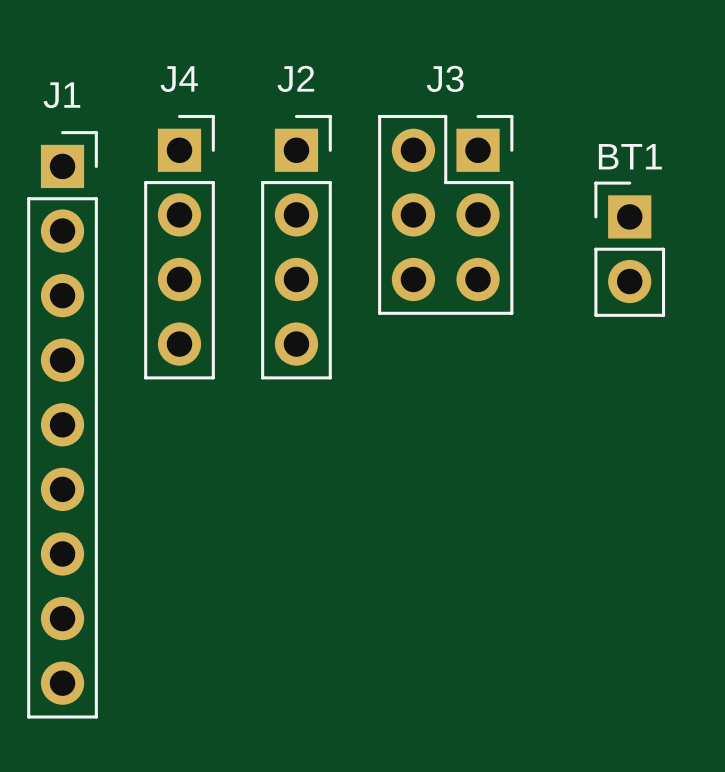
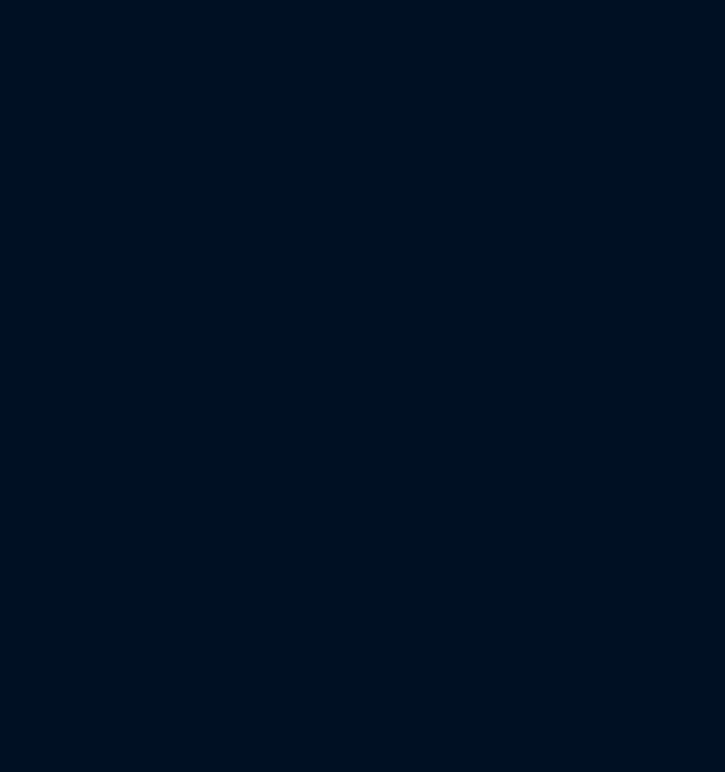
J3: (445, 214) -> none
J4: (179, 247) -> none
J2: (296, 247) -> none
BT1: (629, 249) -> none
J1: (62, 424) -> none

